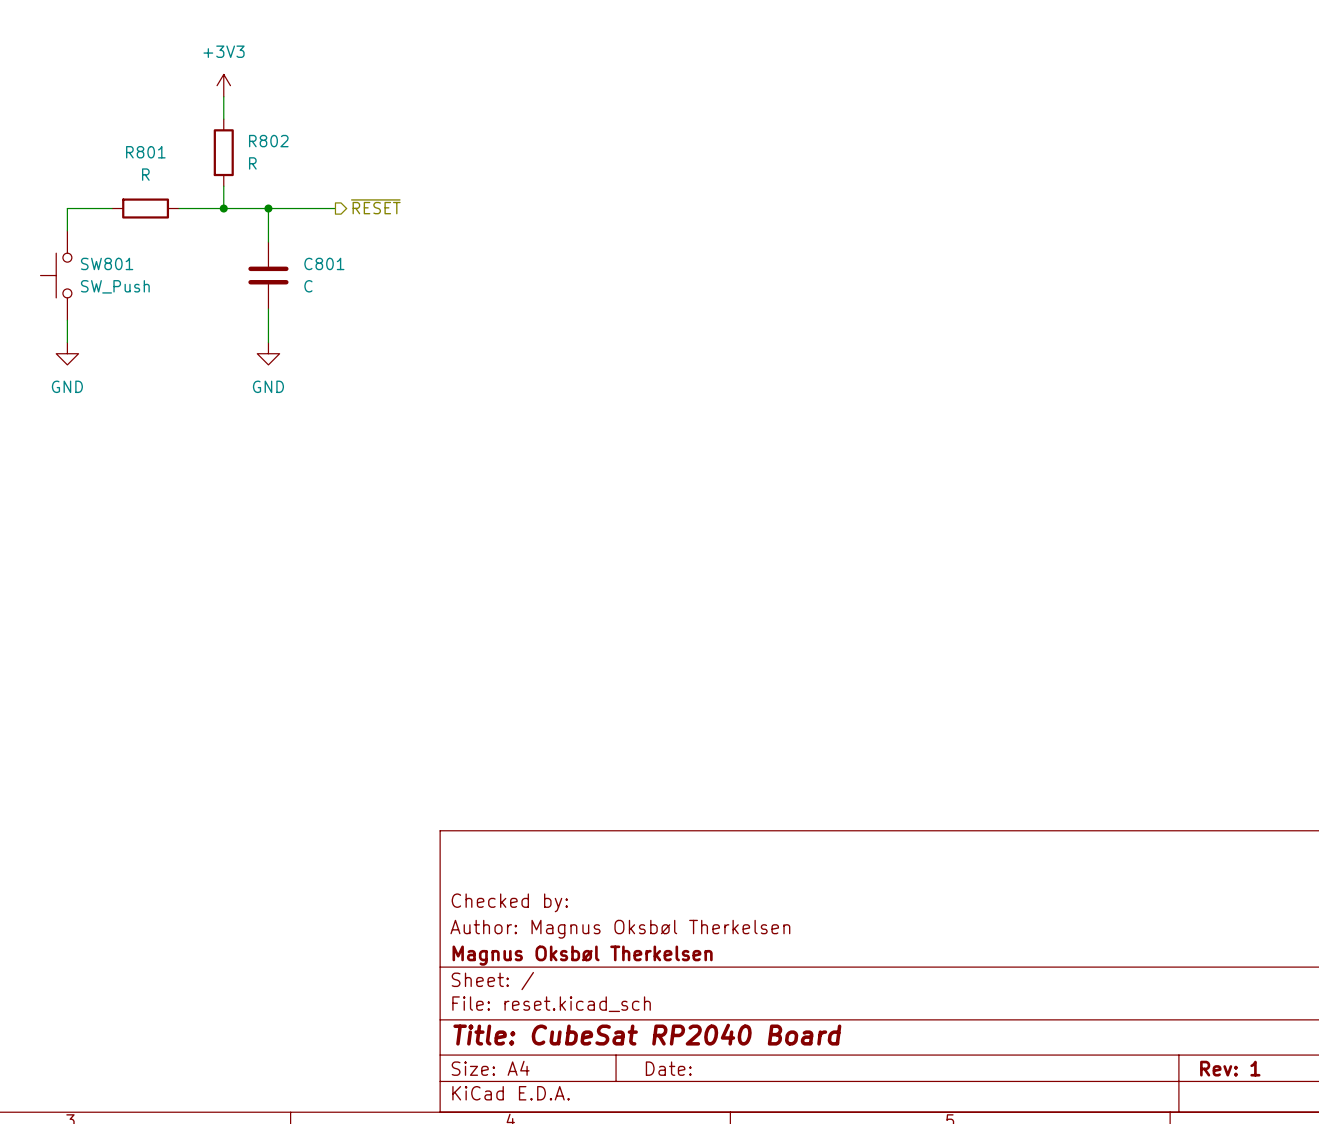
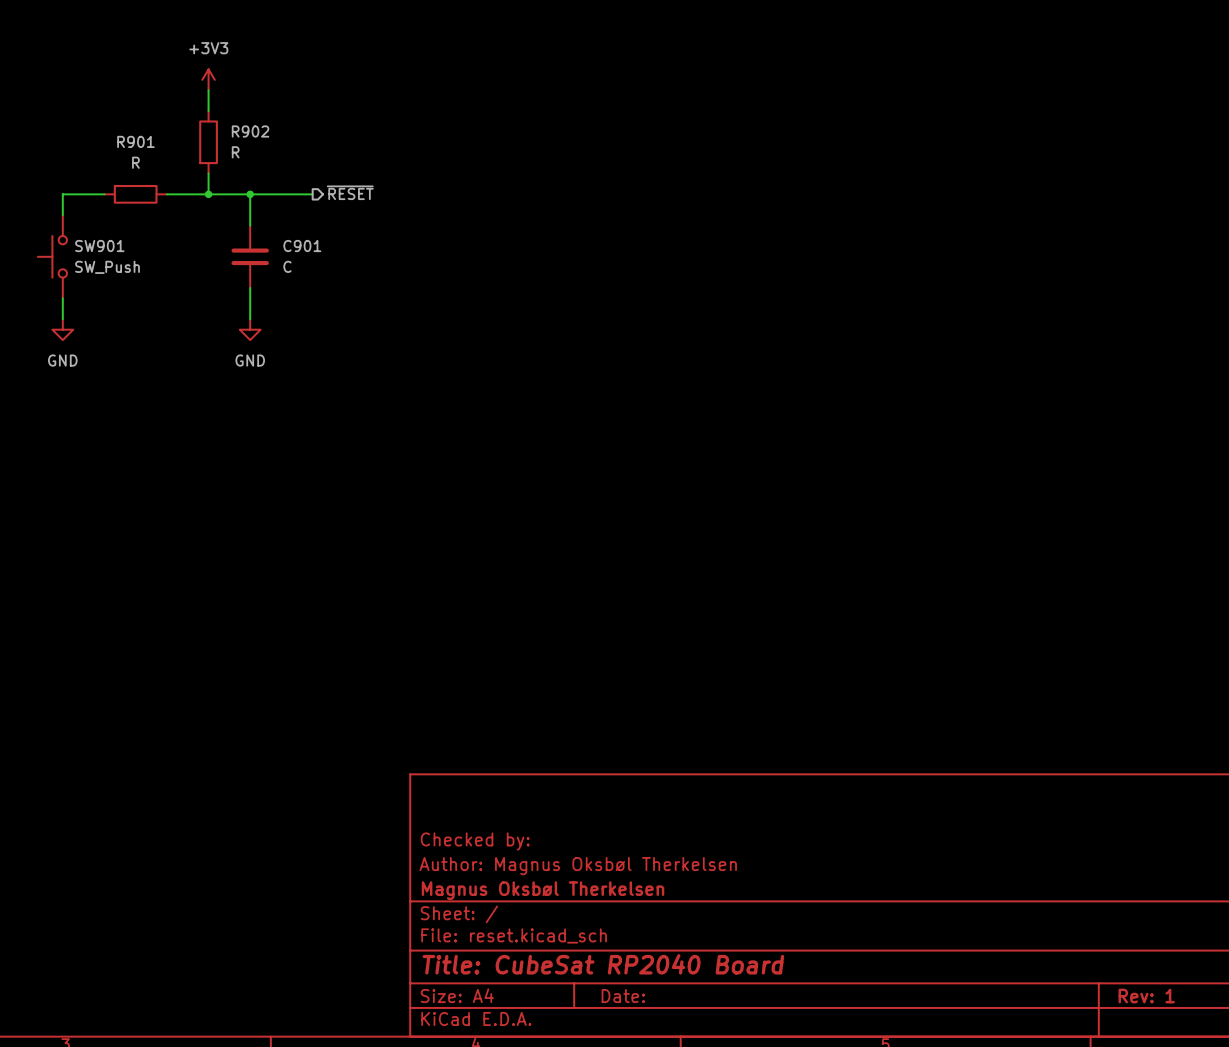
R802 name: R802 (268, 141) -> R902 (250, 131)
R801 name: R801 (145, 152) -> R901 (135, 141)
SW801 name: SW801 (107, 263) -> SW901 (99, 246)
C801 name: C801 (324, 263) -> C901 (302, 246)

